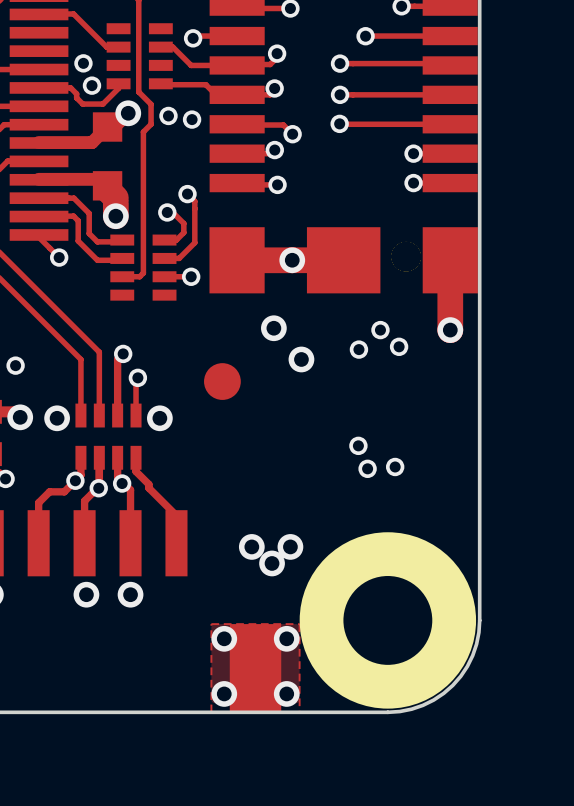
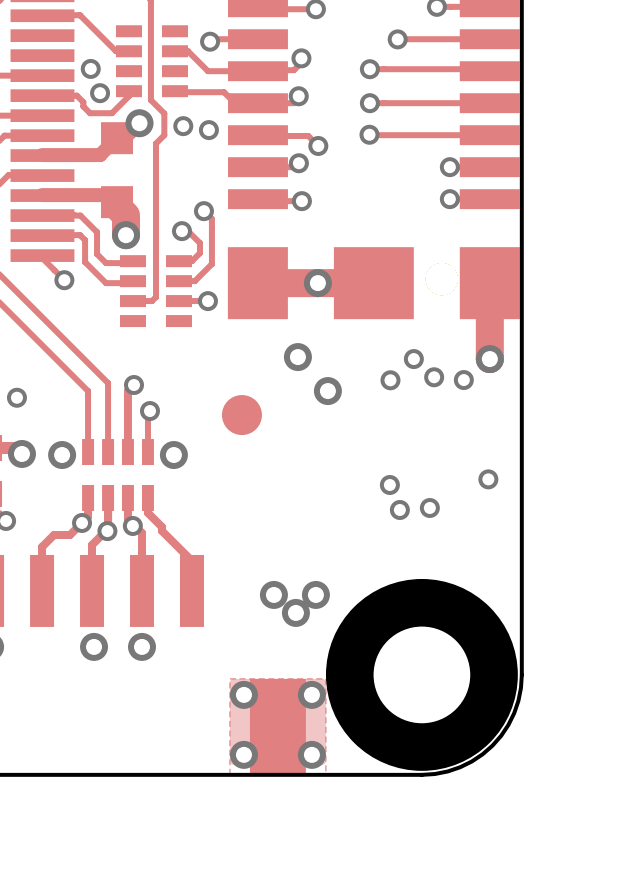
via: none -> (463, 380)
via: none -> (488, 479)

